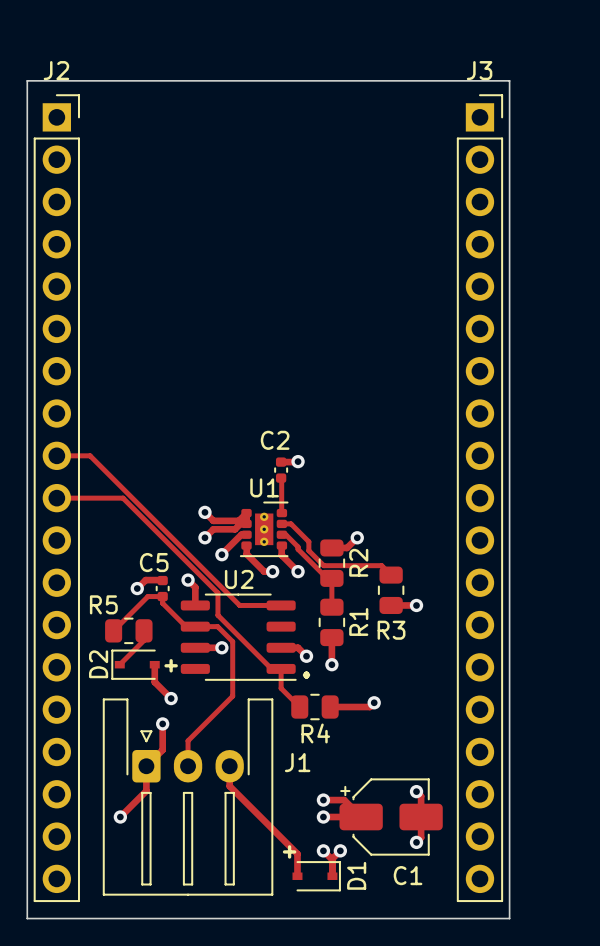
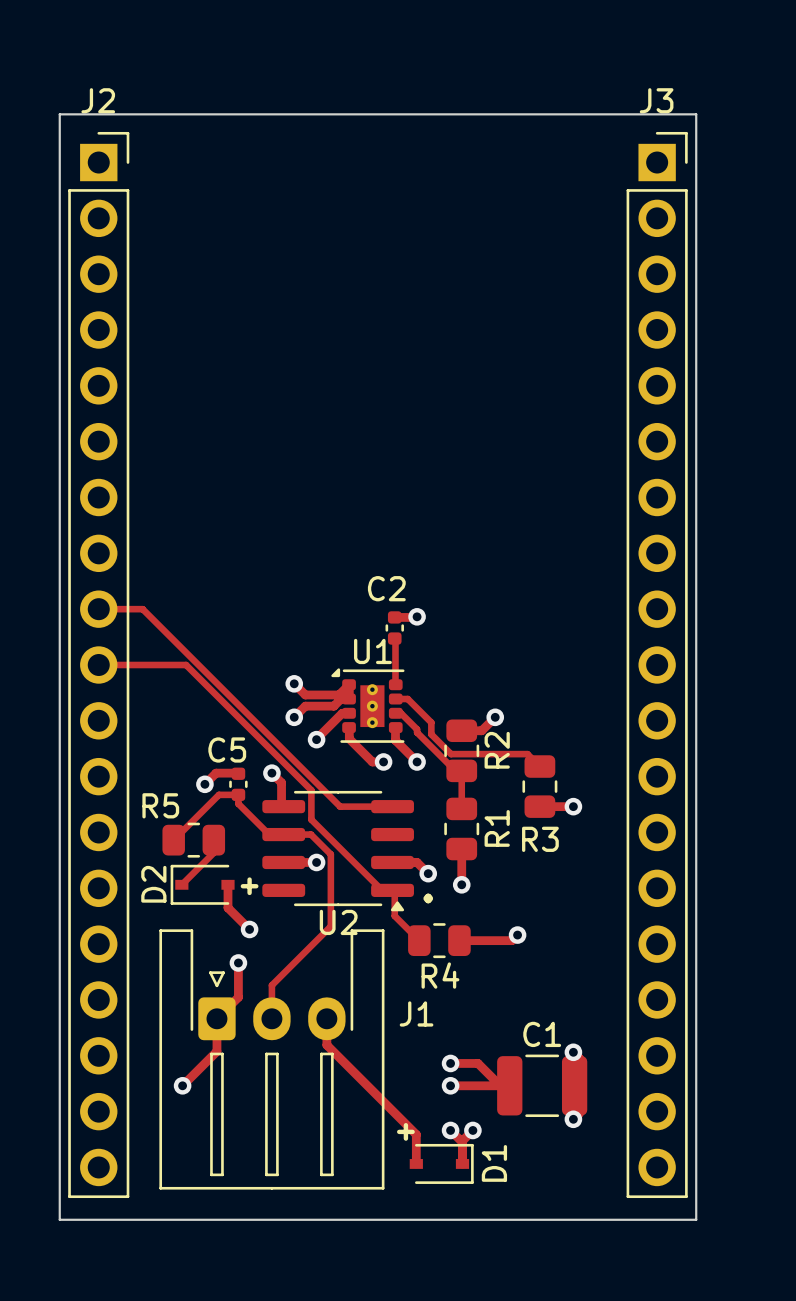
U1 footprint: [239, 501, 289, 558] -> [331, 668, 405, 743]
U2 name position: U2 (239, 579) -> U2 (338, 922)
U2 footprint: [180, 593, 297, 681] -> [262, 790, 414, 912]
C1 footprint: [339, 778, 443, 856] -> [497, 1054, 588, 1118]
C1 name position: C1 (408, 875) -> C1 (542, 1034)

